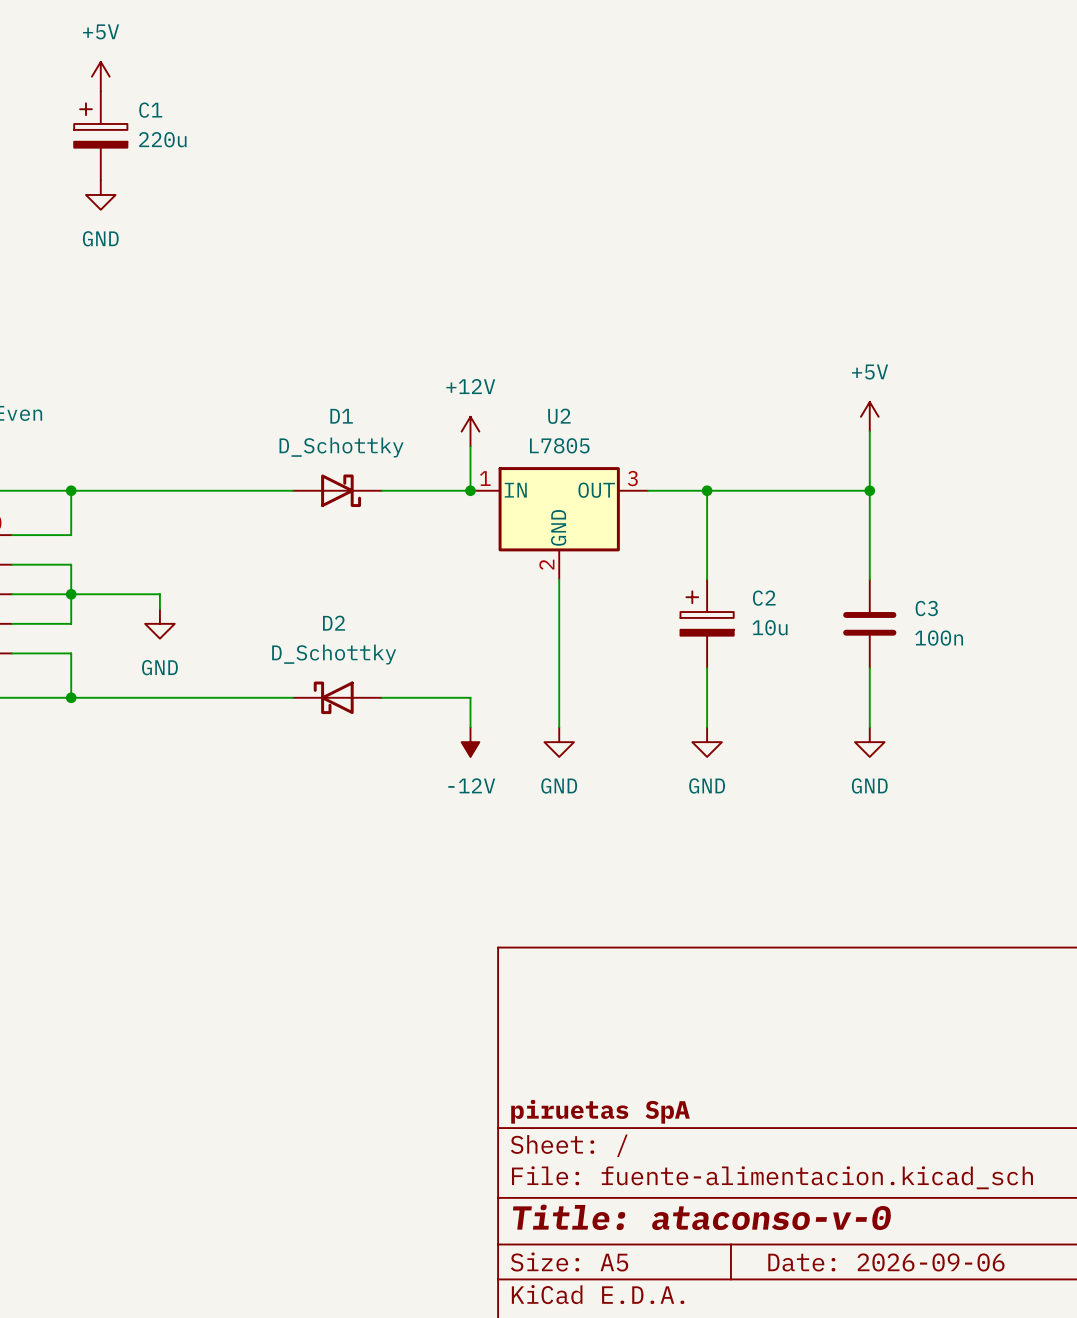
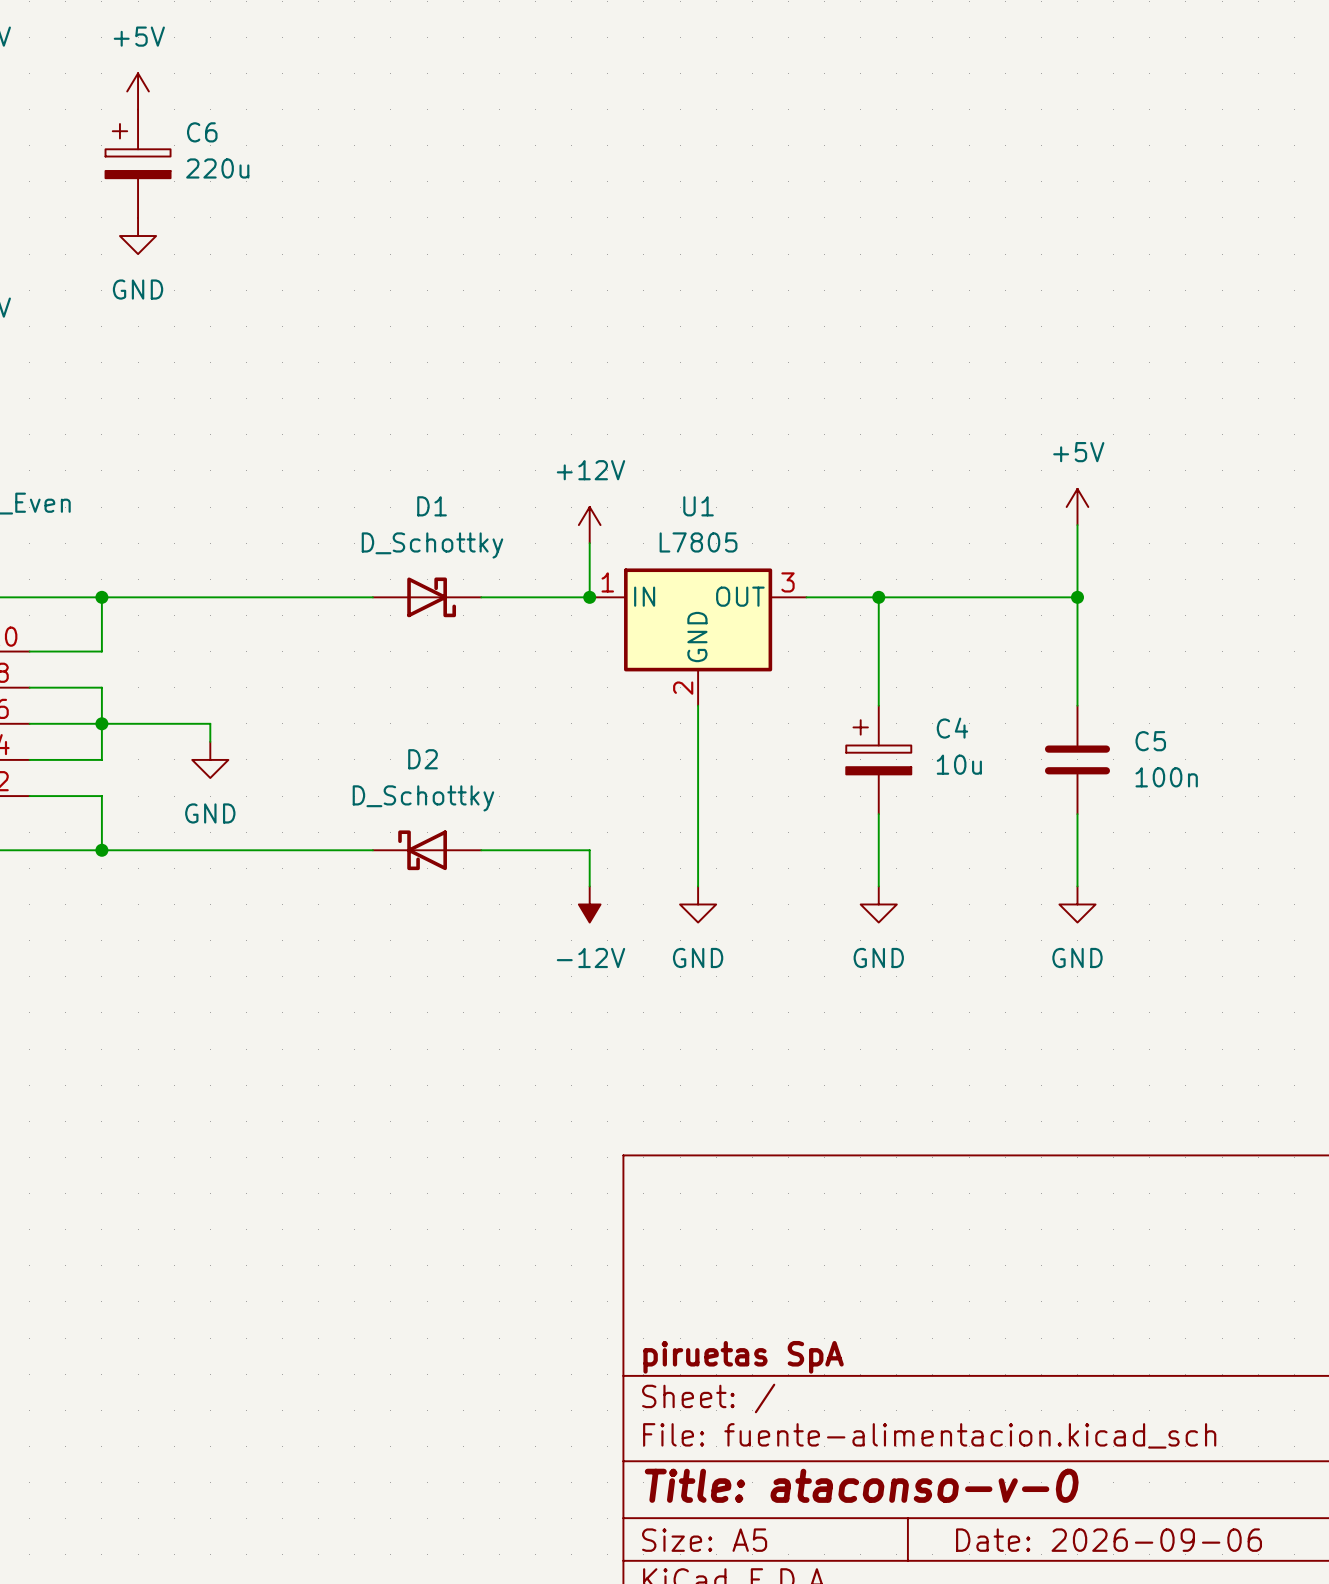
C1 name: C1 (150, 110) -> C6 (202, 132)
U2 name: U2 (559, 416) -> U1 (698, 506)
C2 name: C2 (764, 598) -> C4 (952, 728)
C3 name: C3 (926, 608) -> C5 (1150, 741)

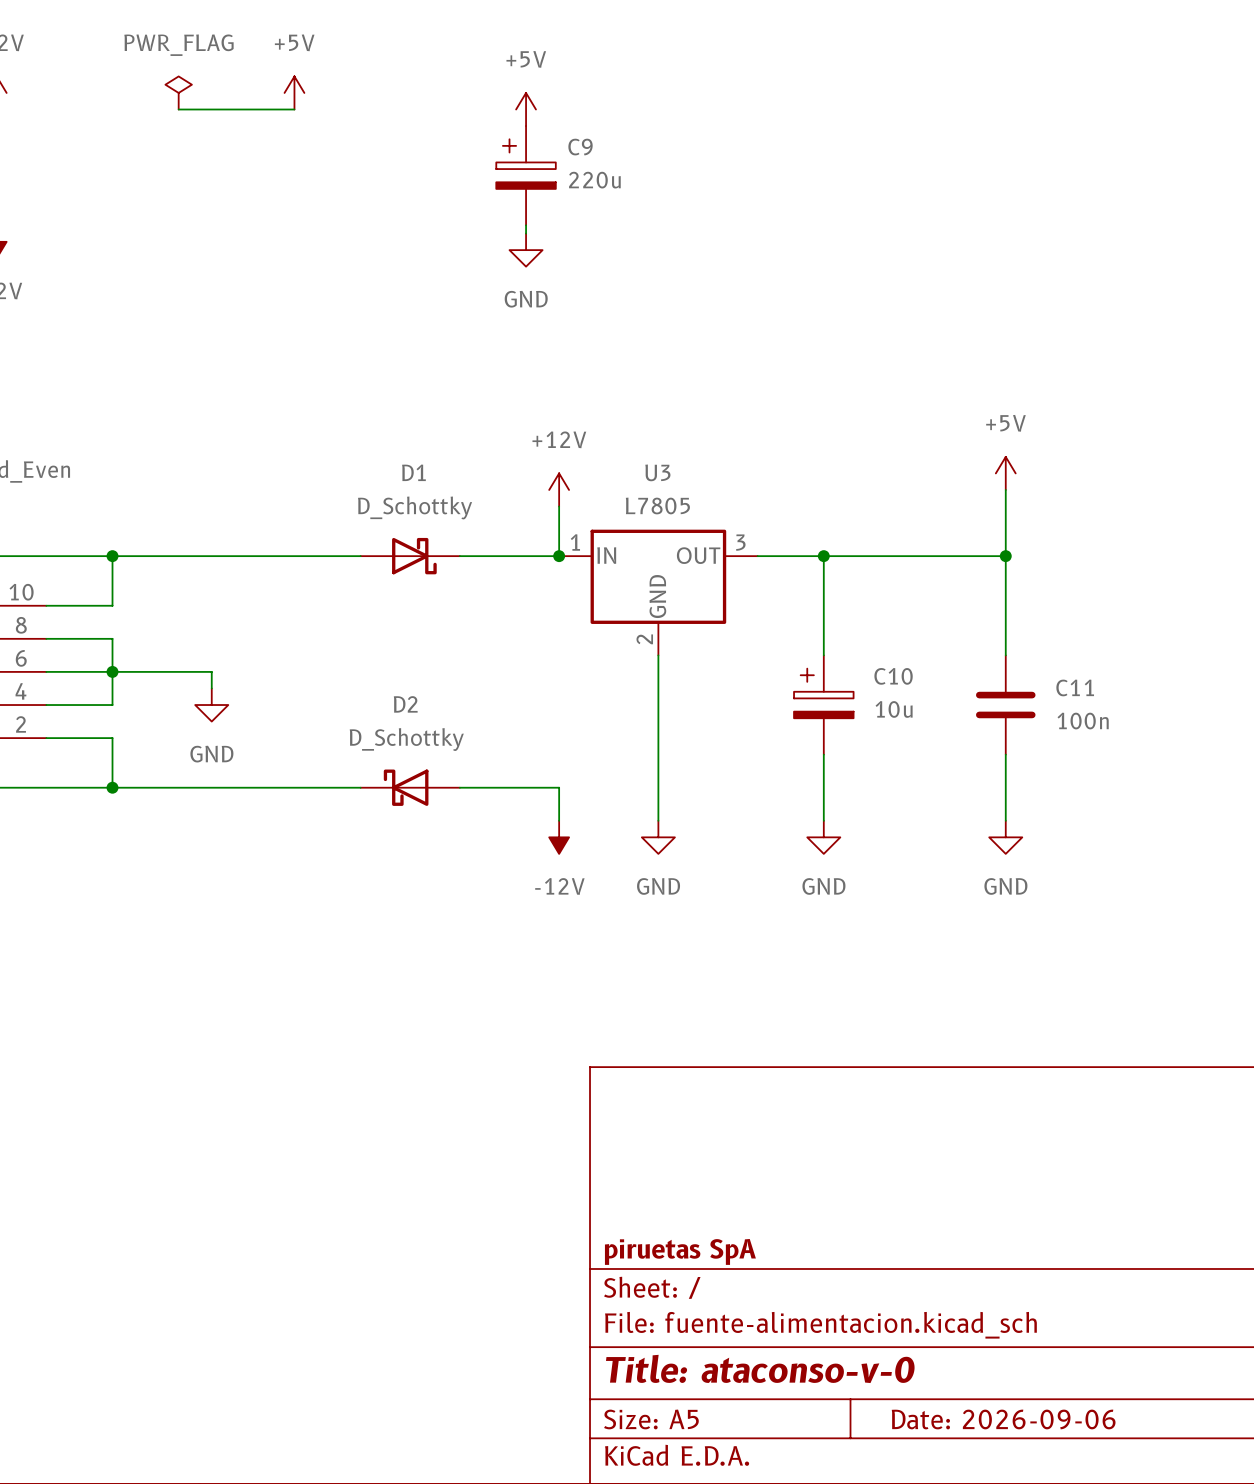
power symbol position: +5V (138, 91) -> +5V (294, 92)
power symbol: none -> PWR_FLAG (178, 92)
wire: none -> (178, 109) (294, 109)
power symbol: none -> +5V (526, 109)
C6: 220u (138, 163) -> none
C9: none -> 220u (526, 175)
power symbol: GND (138, 236) -> none
wire: none -> (526, 225) (526, 233)
power symbol: none -> GND (526, 250)
U1 name: U1 (698, 506) -> U3 (657, 472)
C4 name: C4 (952, 728) -> C10 (893, 676)
C5 name: C5 (1150, 741) -> C11 (1075, 687)

